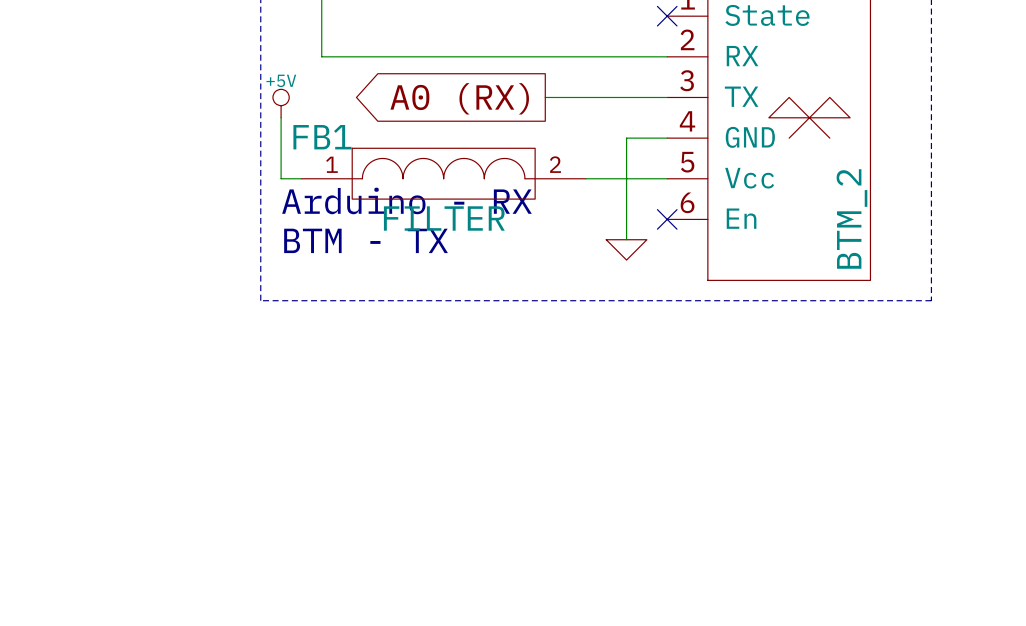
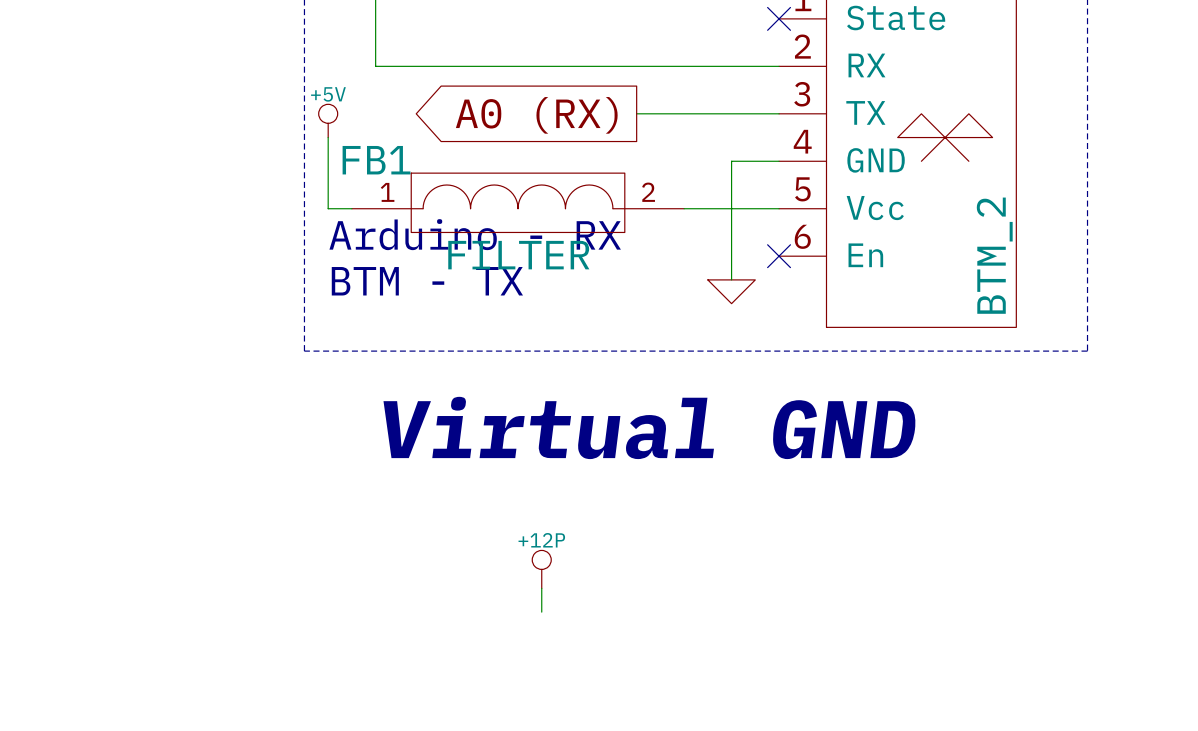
text: none -> Virtual GND (650, 427)
power symbol: none -> +12P (541, 569)
wire: none -> (541, 588) (541, 612)

